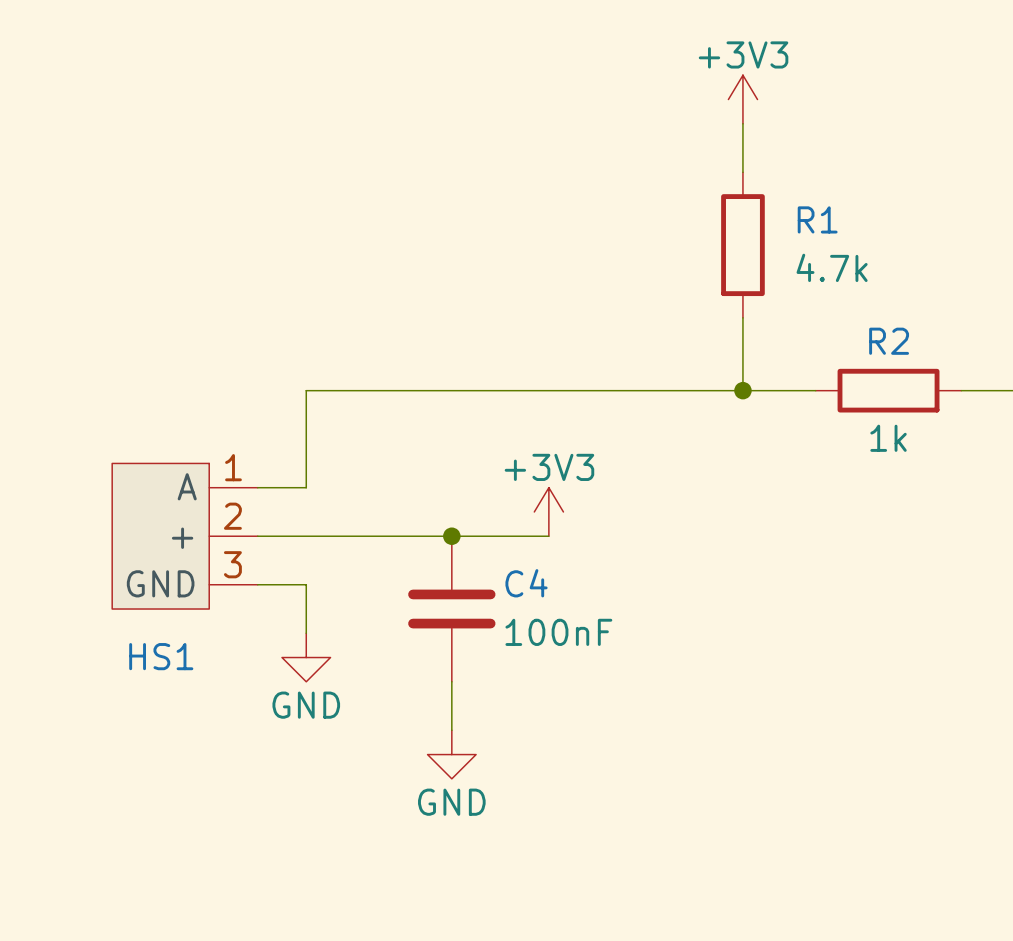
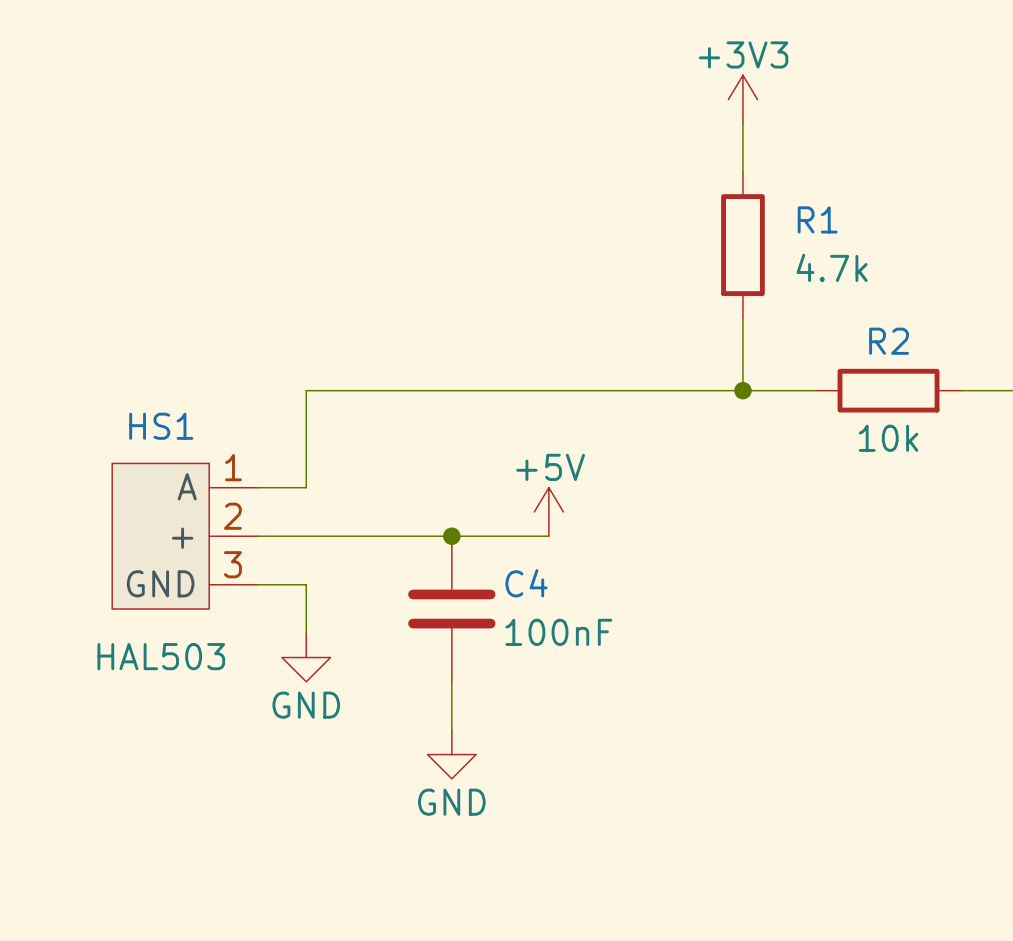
R2 value: 1k (888, 438) -> 10k (888, 438)
power symbol: +3V3 (548, 511) -> +5V (548, 511)
HS1 name position: HS1 (161, 656) -> HS1 (161, 426)
HS1 value: none -> HAL503 (161, 656)

